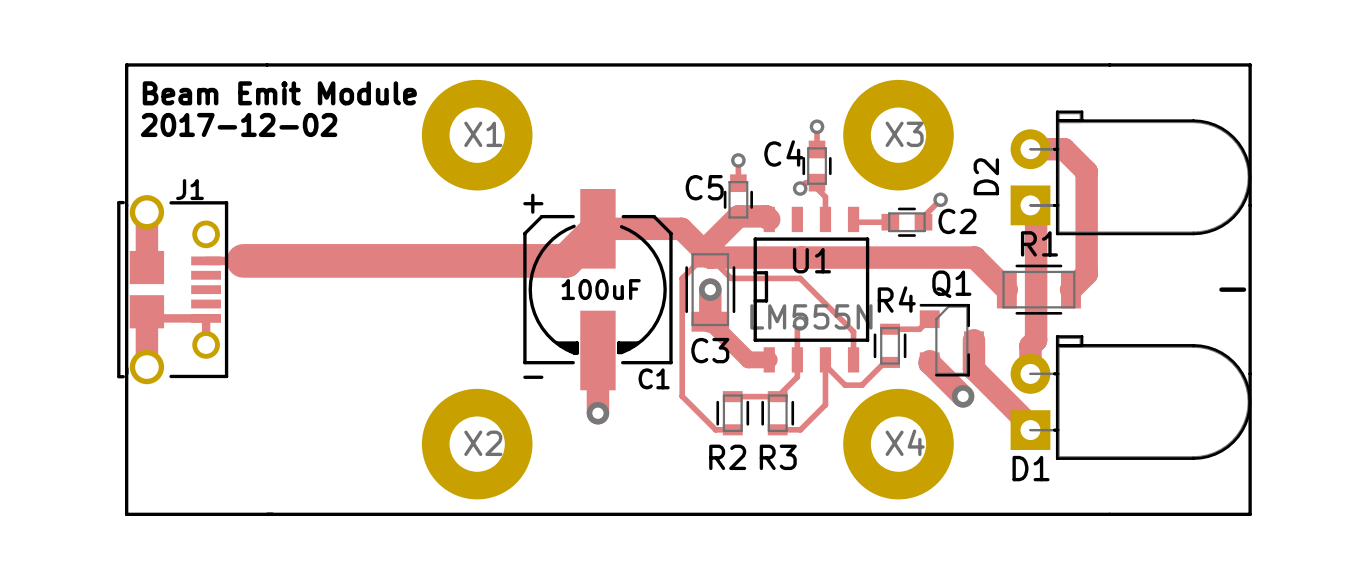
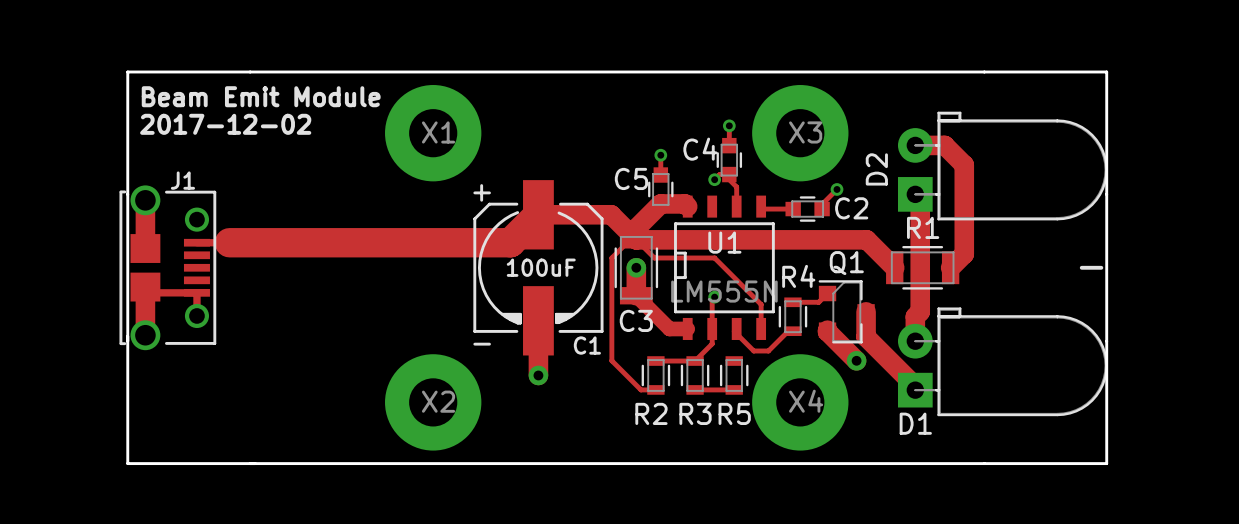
track: (825, 365) (825, 404) (800, 429) -> (734, 389) (714, 389)
R5: none -> (734, 375)

